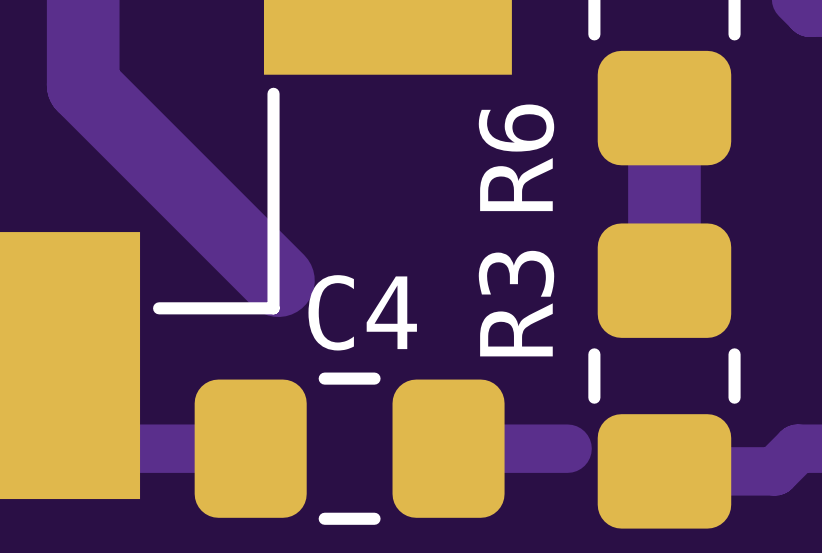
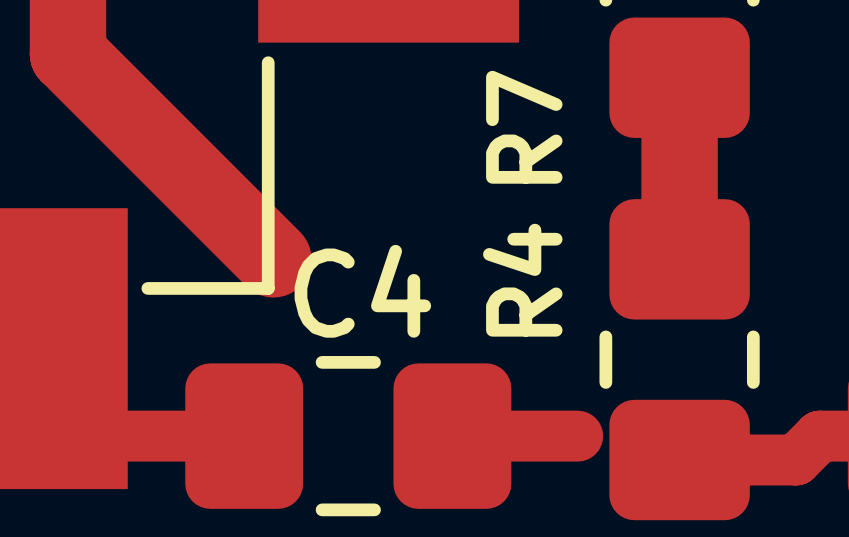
R6 name: R6 (516, 157) -> R7 (524, 127)
R3 name: R3 (516, 303) -> R4 (522, 280)

